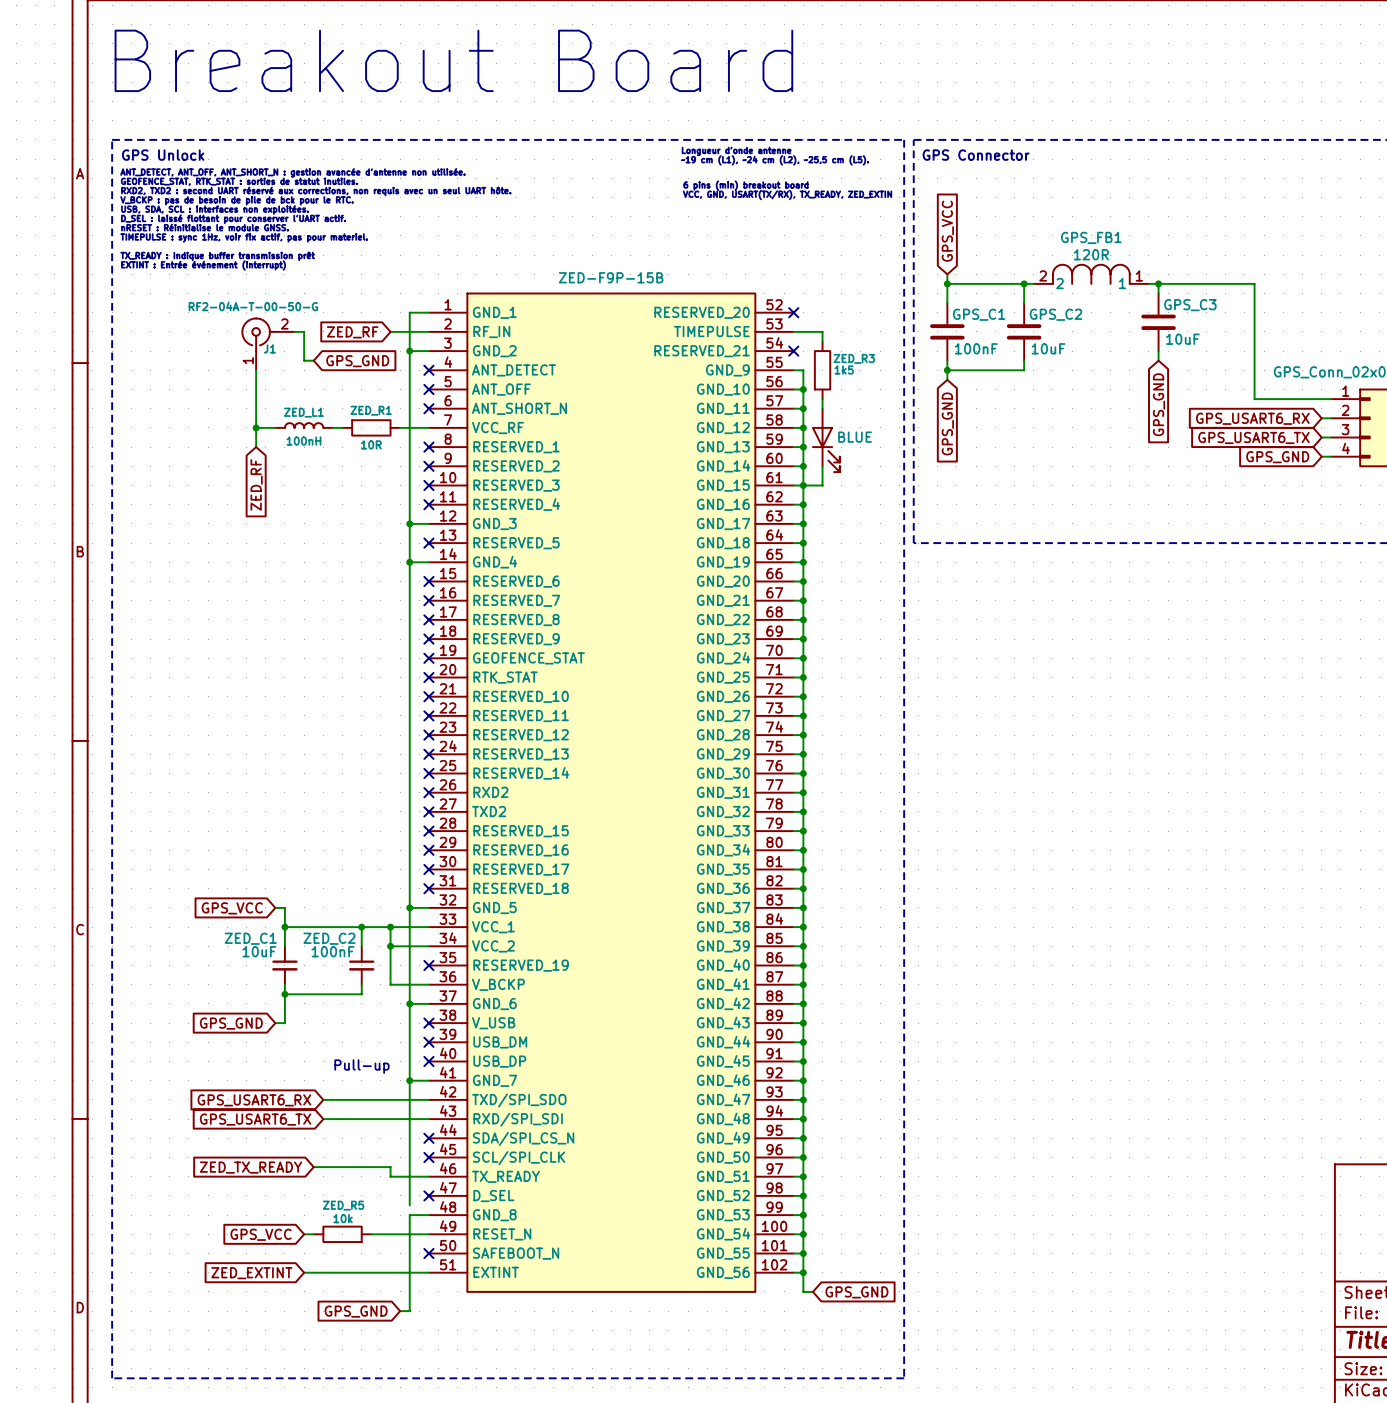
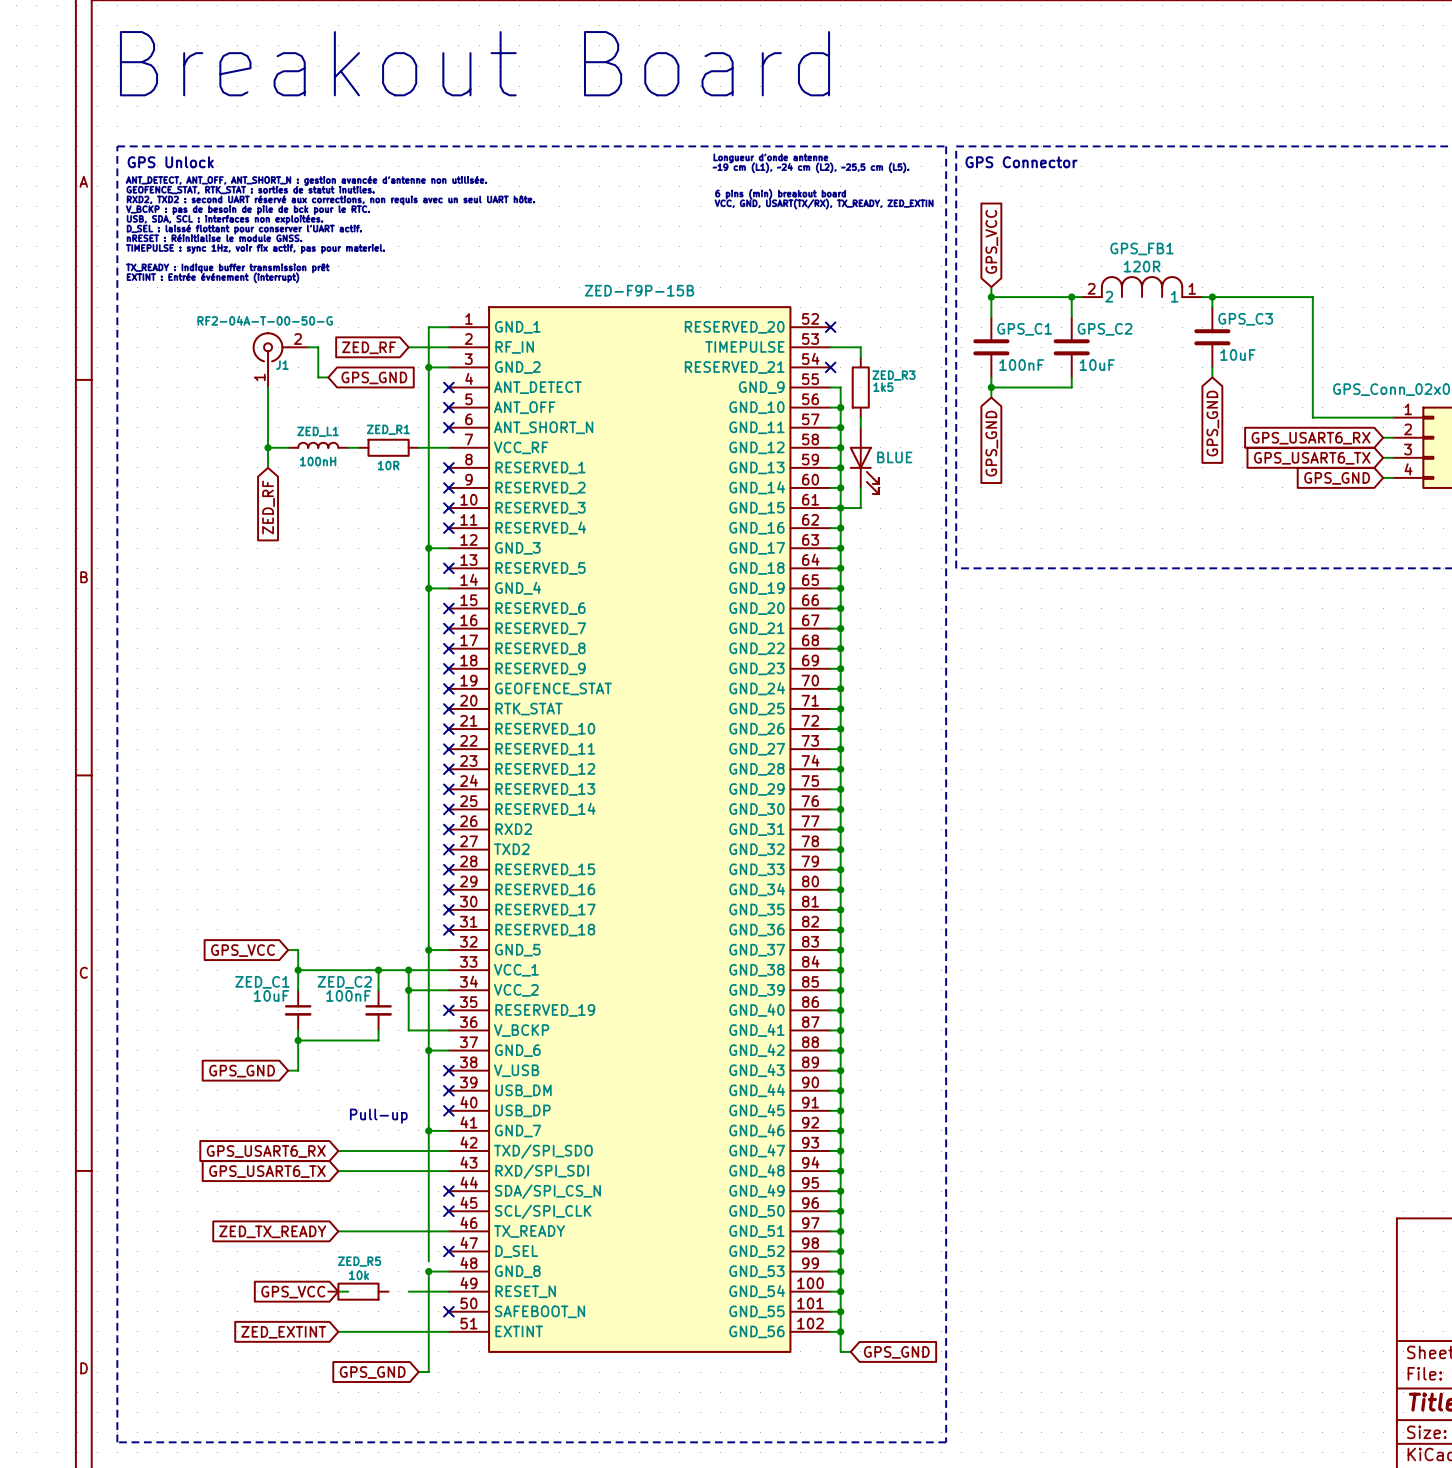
global label position: ZED_TX_READY (250, 1167) -> ZED_TX_READY (272, 1231)
wire: (313, 1167) (390, 1167) (390, 1176) -> (338, 1231) (408, 1231)
junction: none -> (428, 1271)
global label position: GPS_VCC (261, 1234) -> GPS_VCC (293, 1292)
wire: (304, 1234) (313, 1234) -> (338, 1291) (348, 1291)
wire: (371, 1234) (390, 1234) -> none
wire: (304, 1272) (323, 1272) -> none
global label position: ZED_EXTINT (251, 1273) -> ZED_EXTINT (283, 1332)

